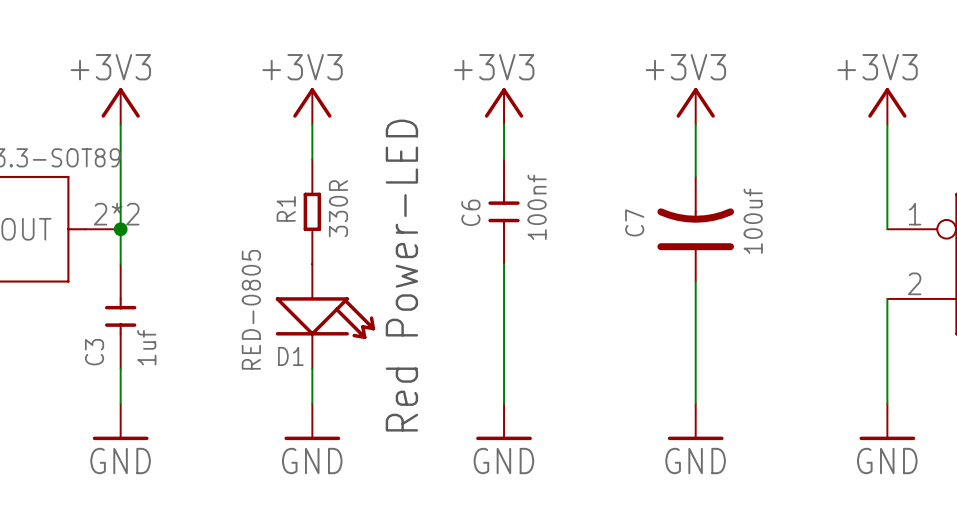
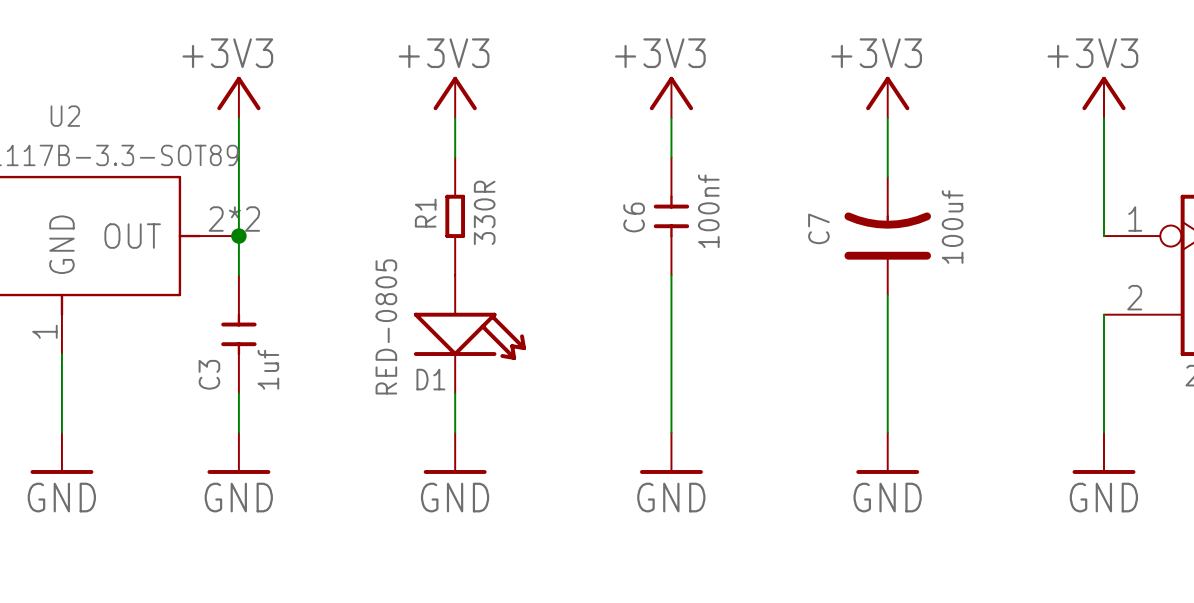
text: Red Power-LED (401, 275) -> none

